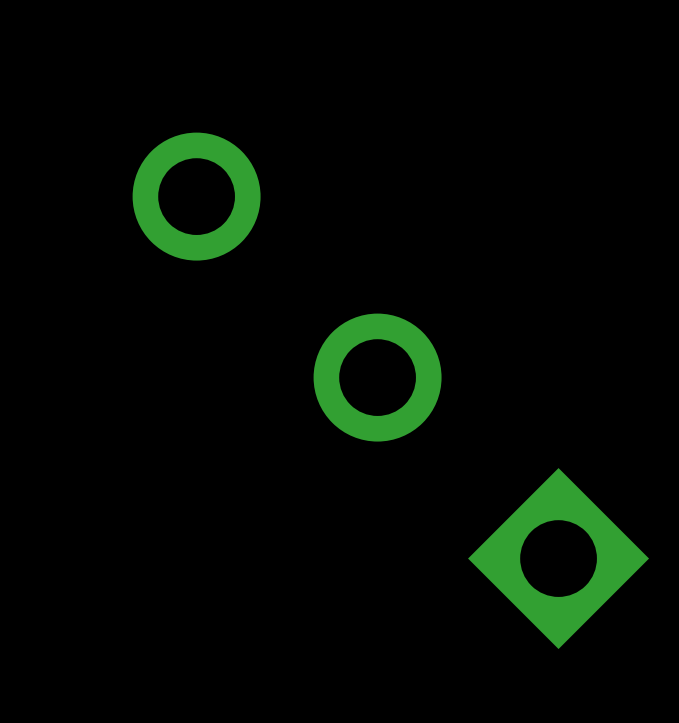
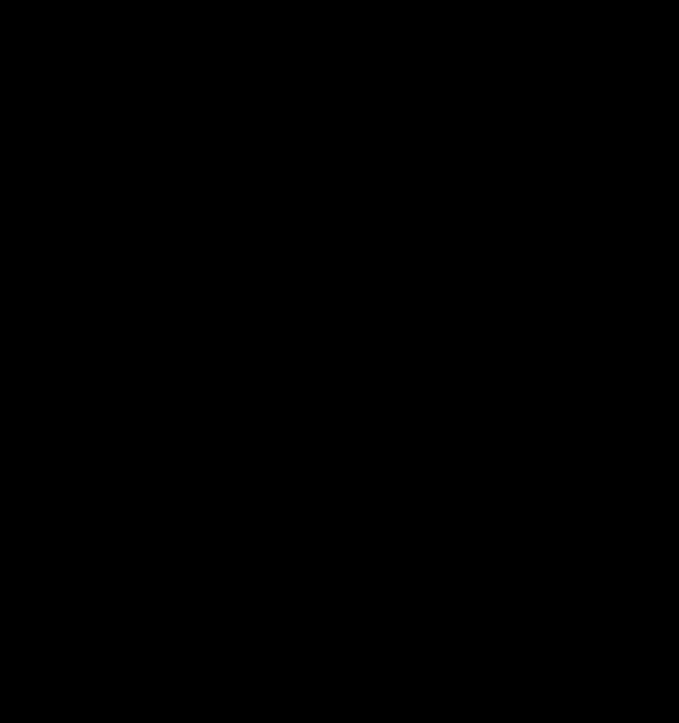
part: (390, 390) -> none

